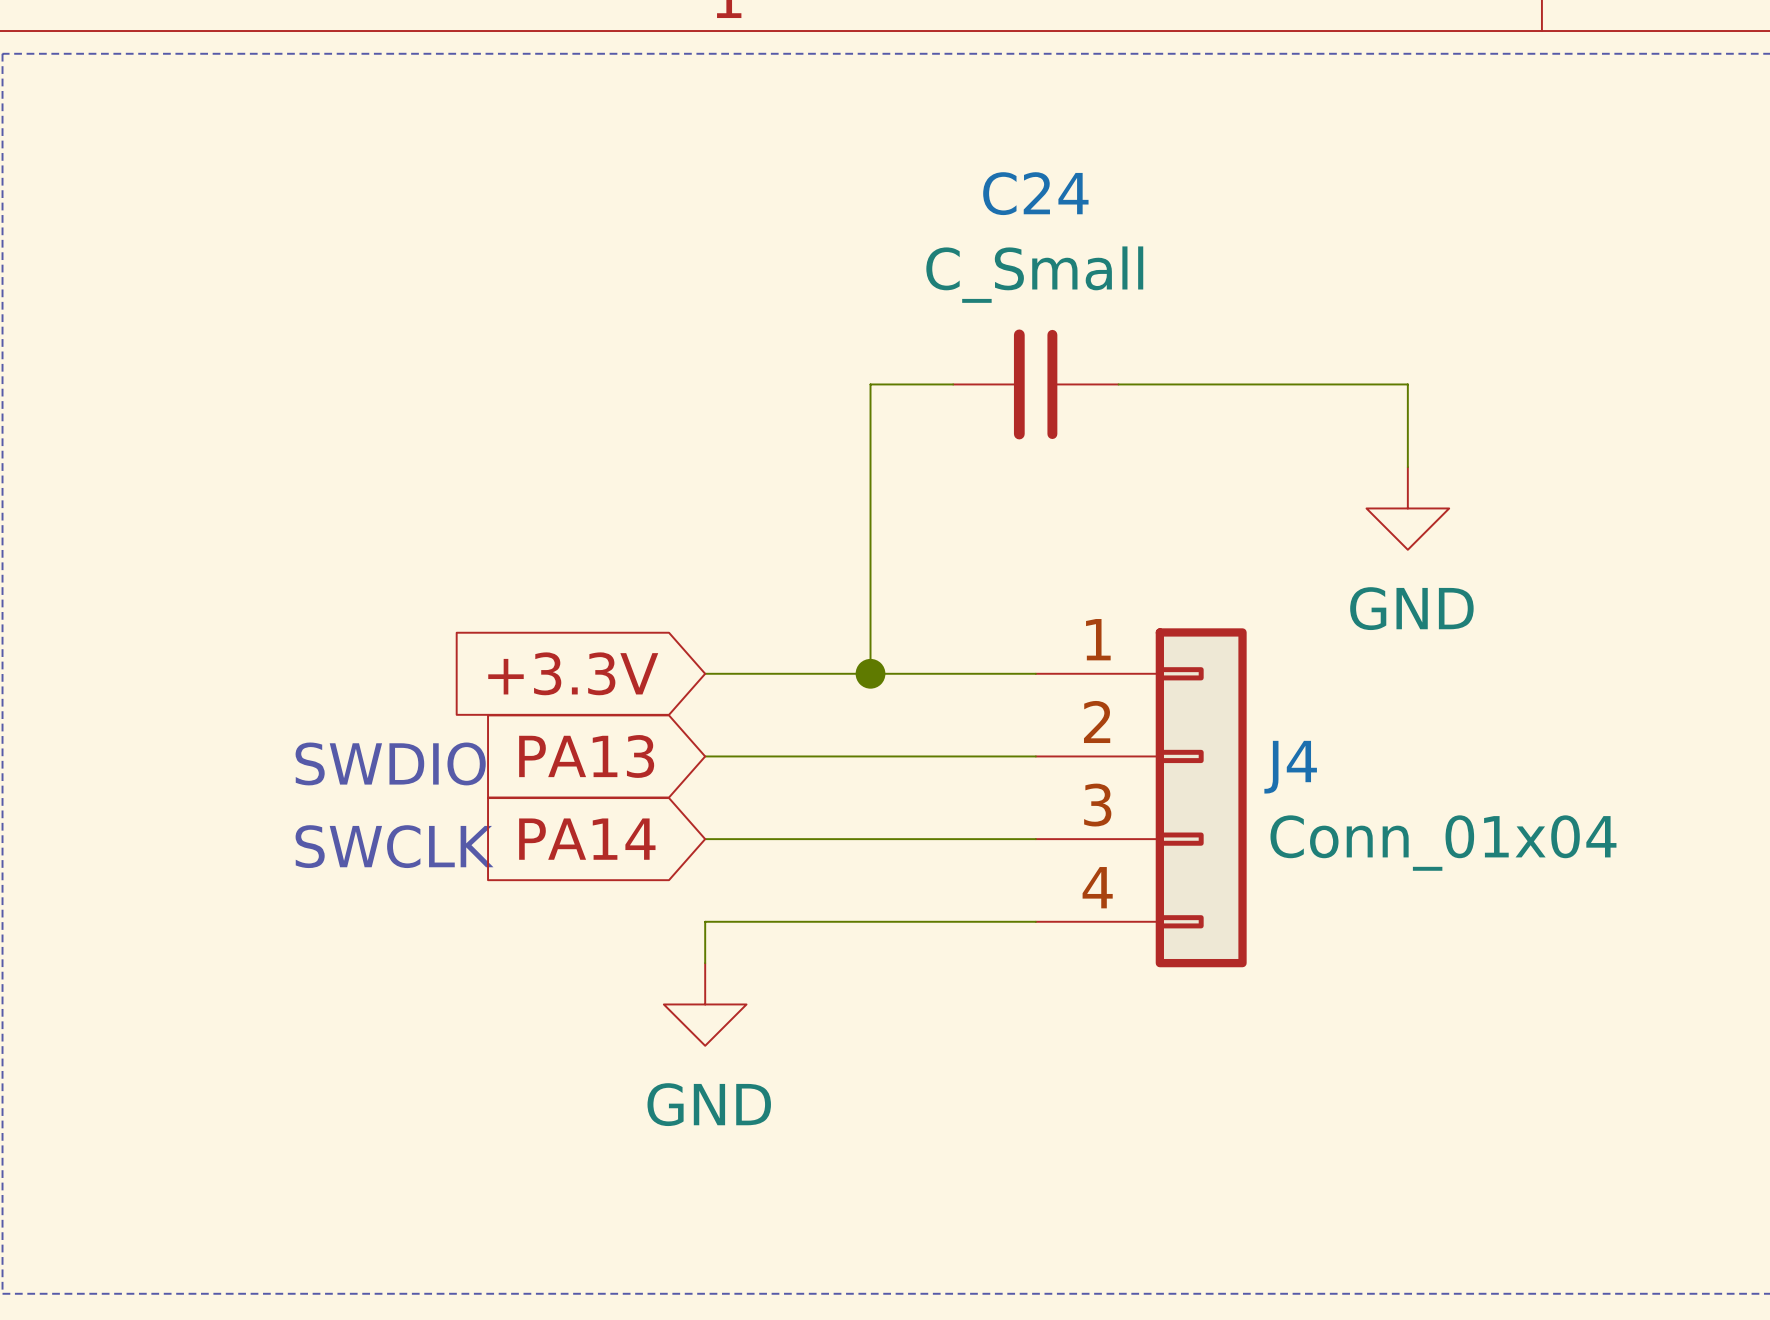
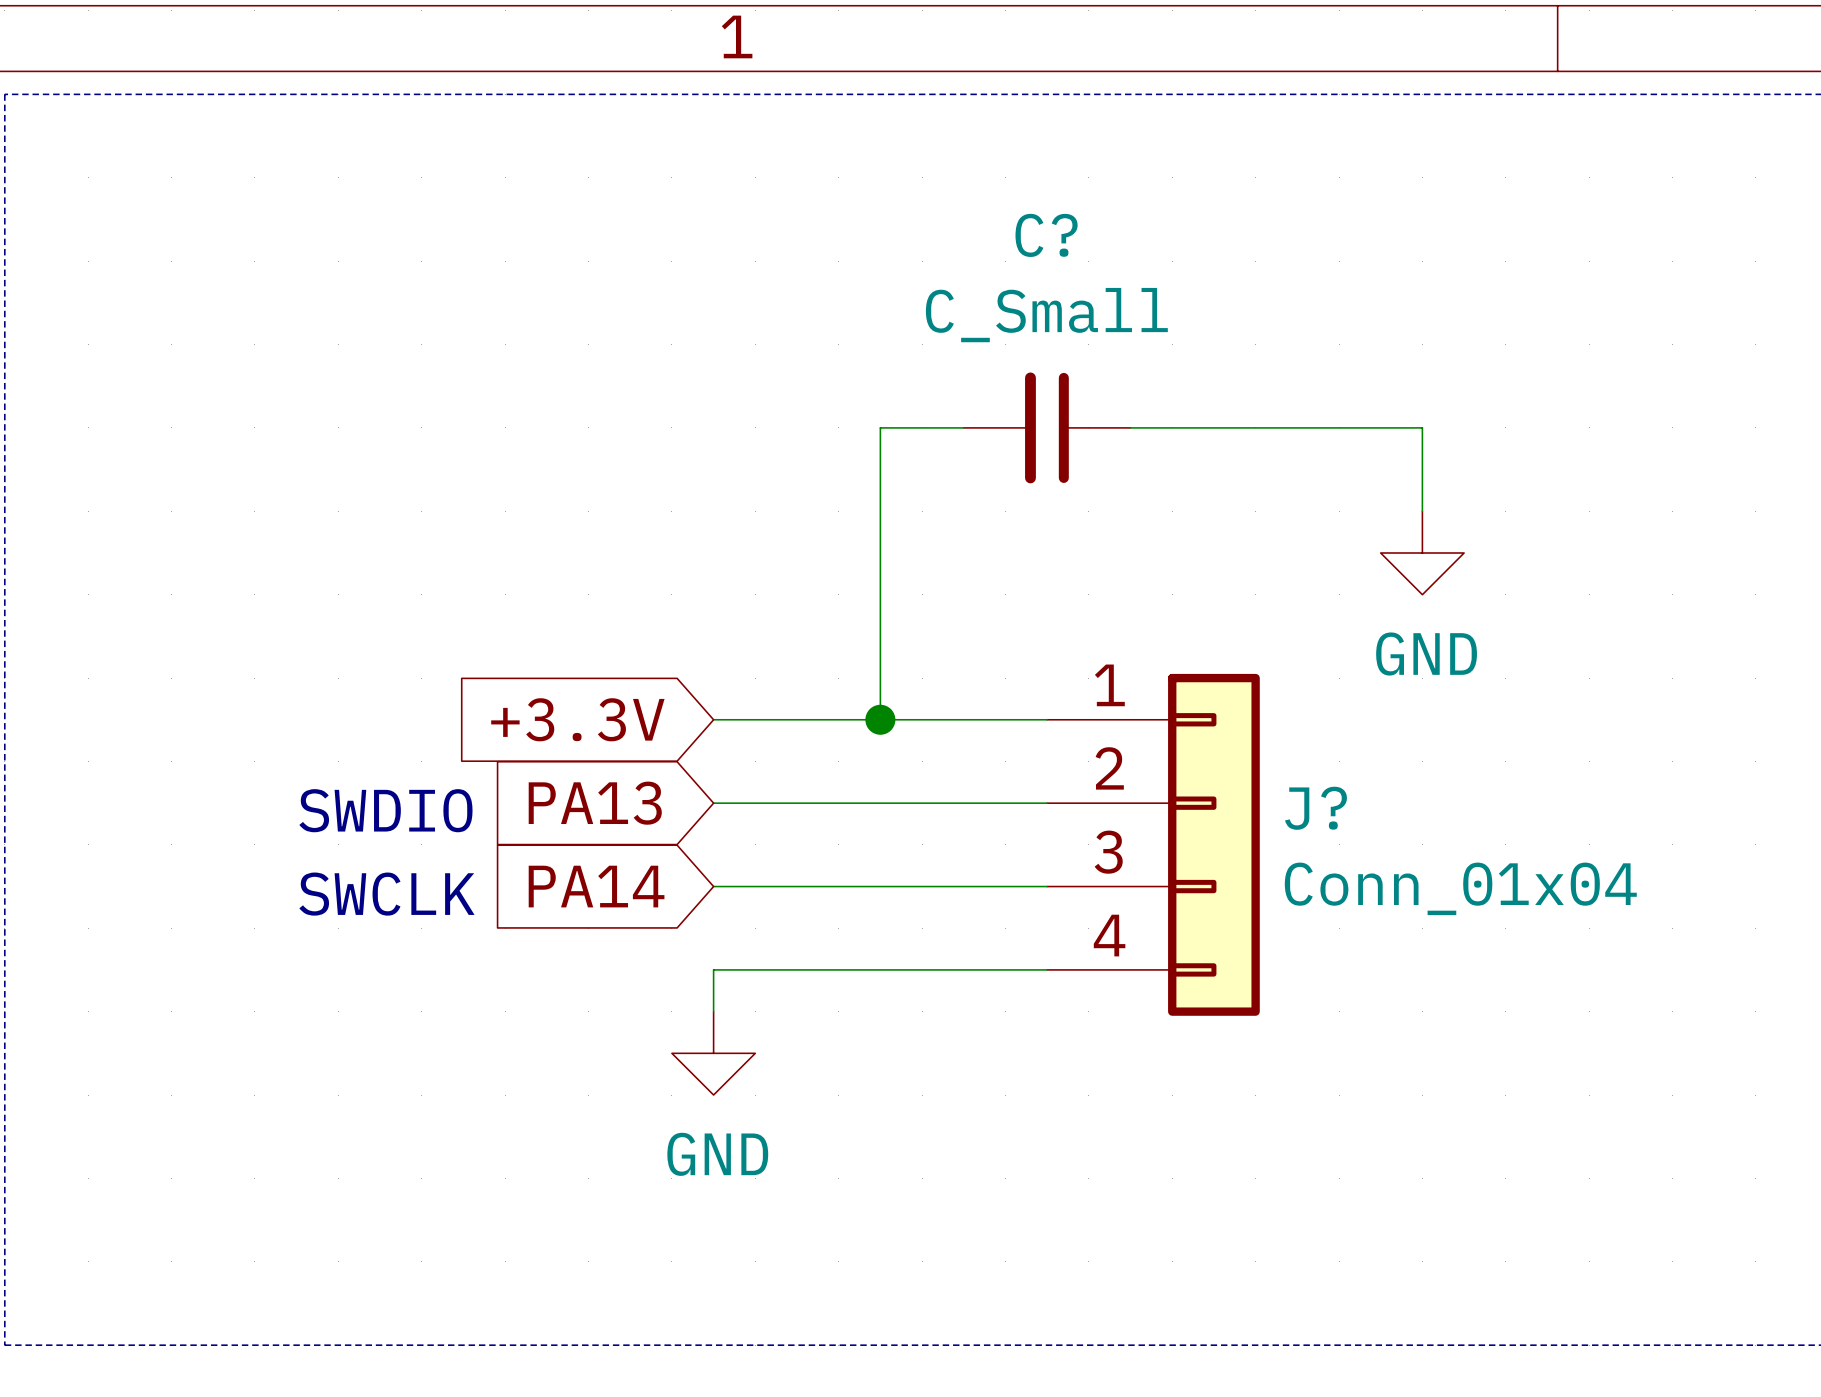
C24 name: C24 (1035, 193) -> C? (1046, 235)
J4 name: J4 (1290, 767) -> J? (1316, 808)

